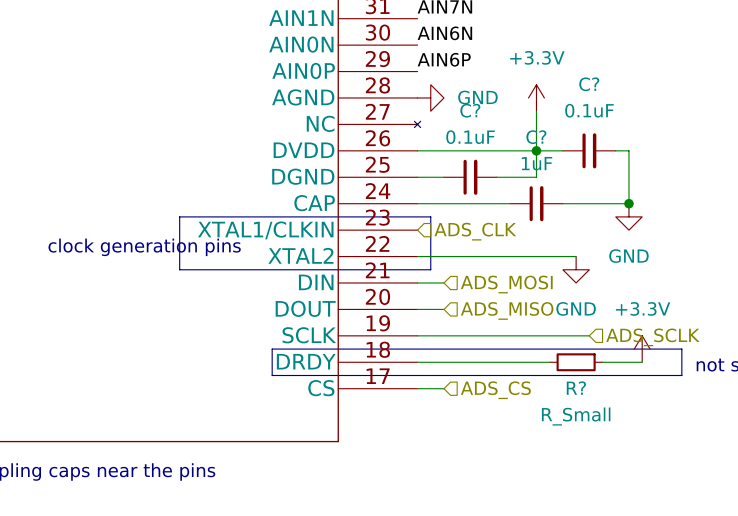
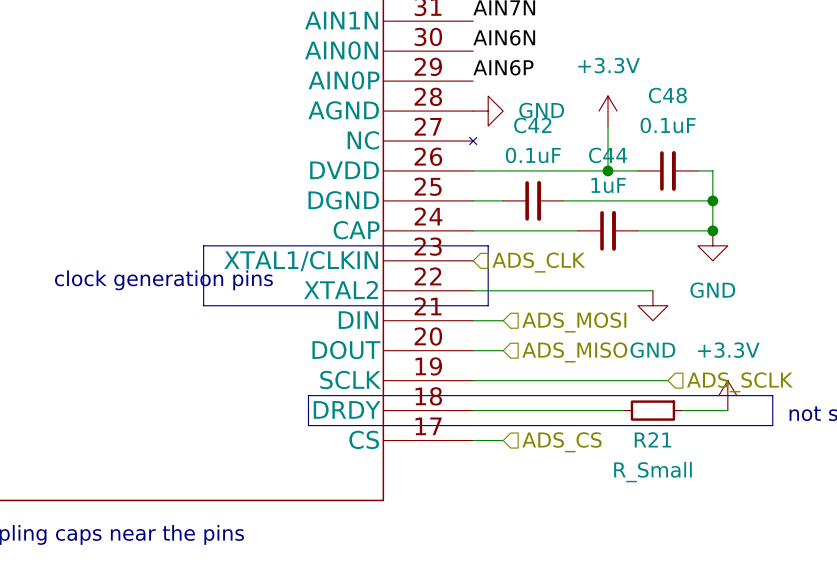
C? name: C? (589, 84) -> C48 (667, 95)
C? name: C? (470, 110) -> C42 (532, 125)
C? name: C? (536, 137) -> C44 (608, 155)
wire: (536, 150) (536, 177) -> (712, 200) (608, 200)
junction: none -> (712, 200)
R? name: R? (576, 388) -> R21 (653, 439)

